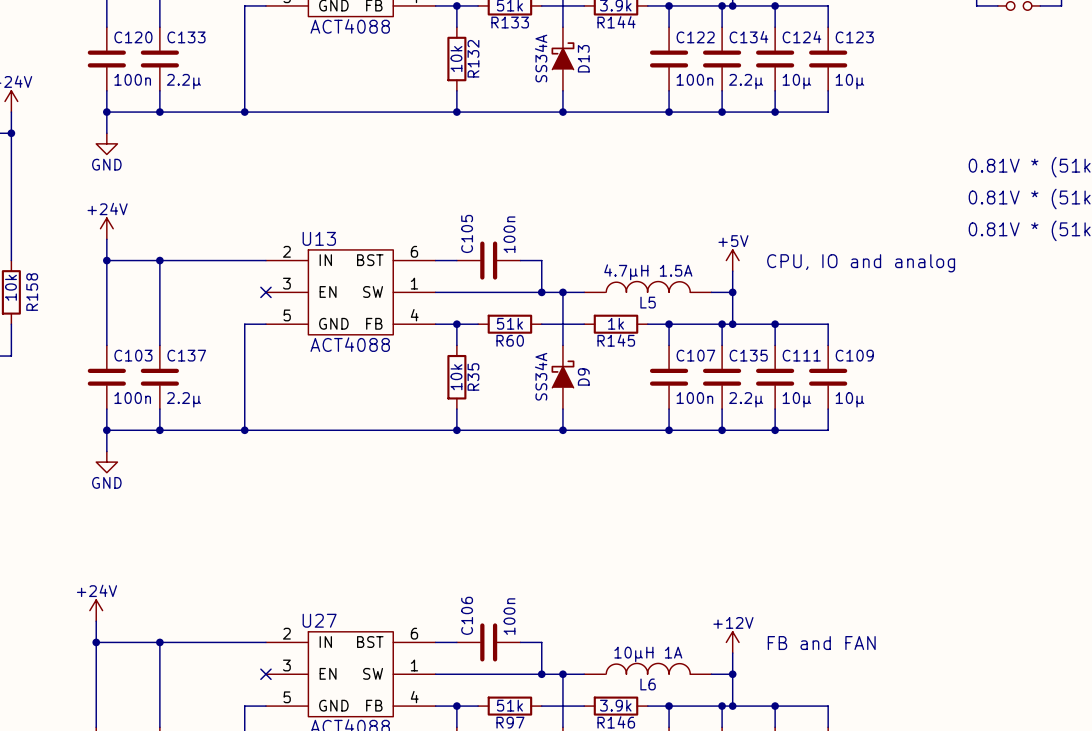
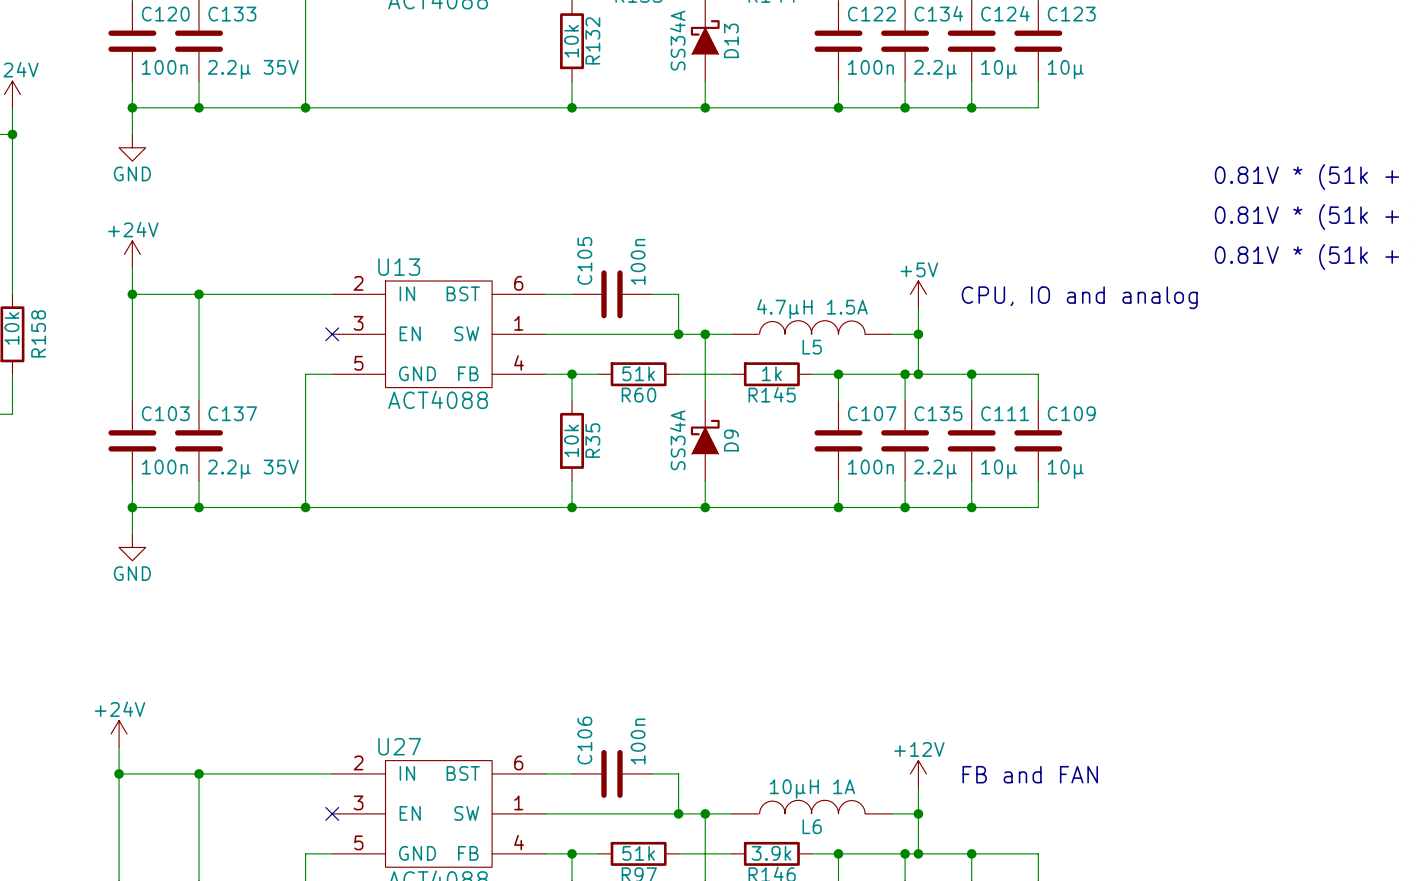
C133 value: 2.2µ (183, 81) -> 2.2µ 35V (253, 69)
C137 value: 2.2µ (183, 399) -> 2.2µ 35V (253, 469)

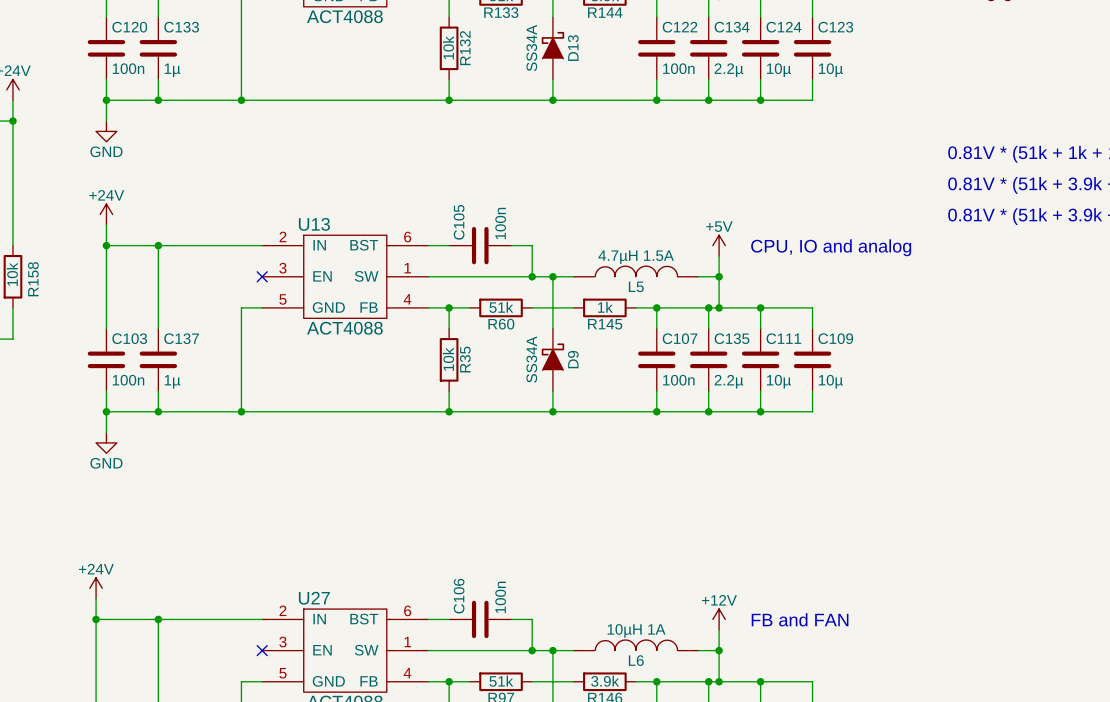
C133 value: 2.2µ 35V (253, 69) -> 1µ (172, 70)
C137 value: 2.2µ 35V (253, 469) -> 1µ (172, 381)

